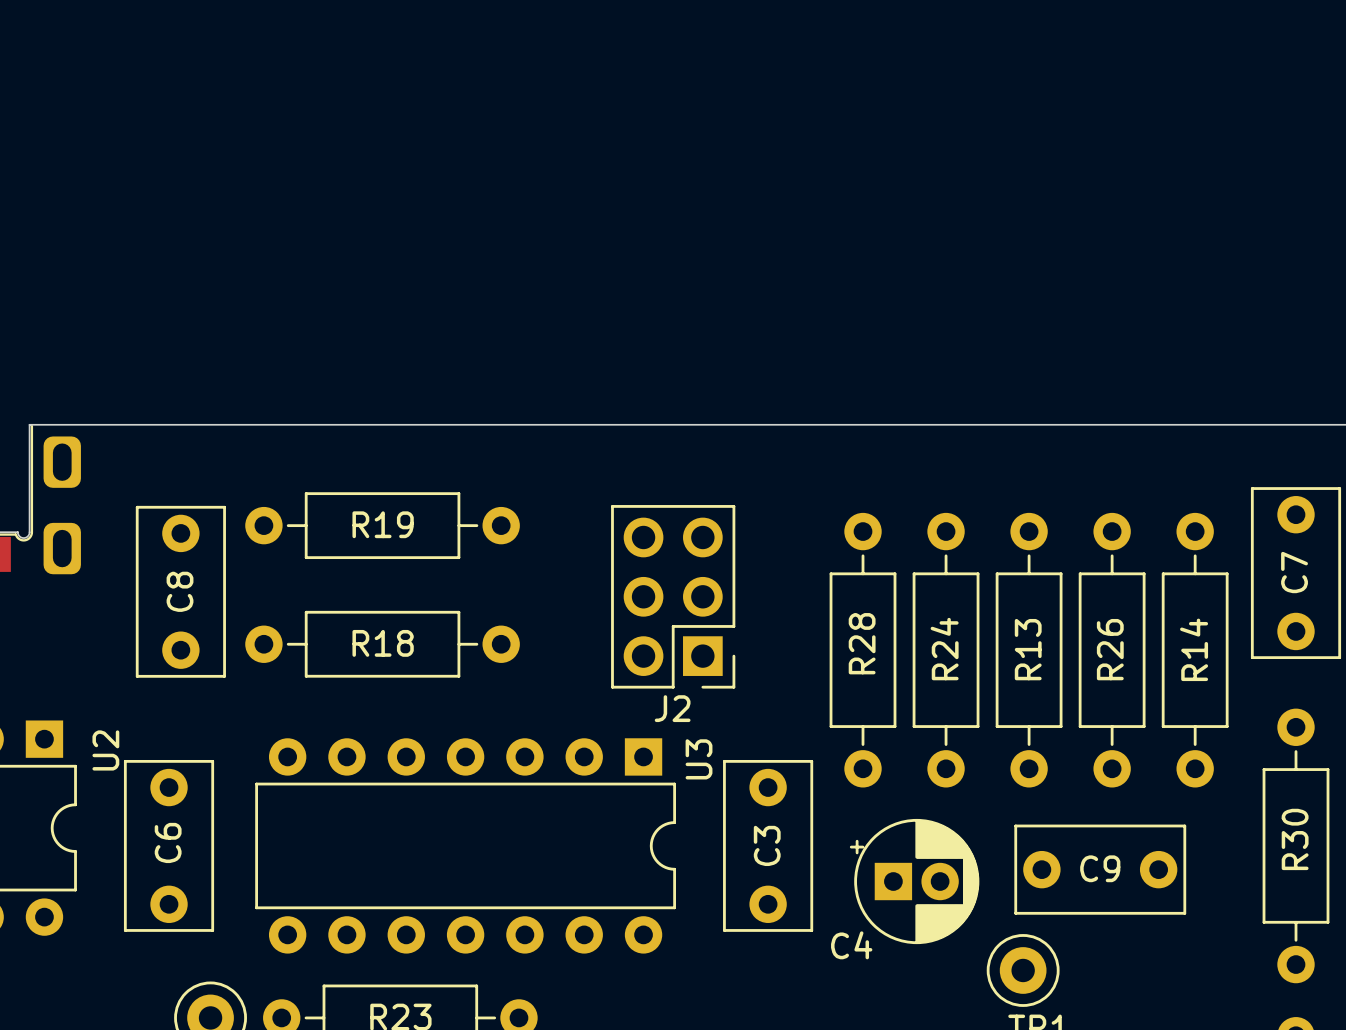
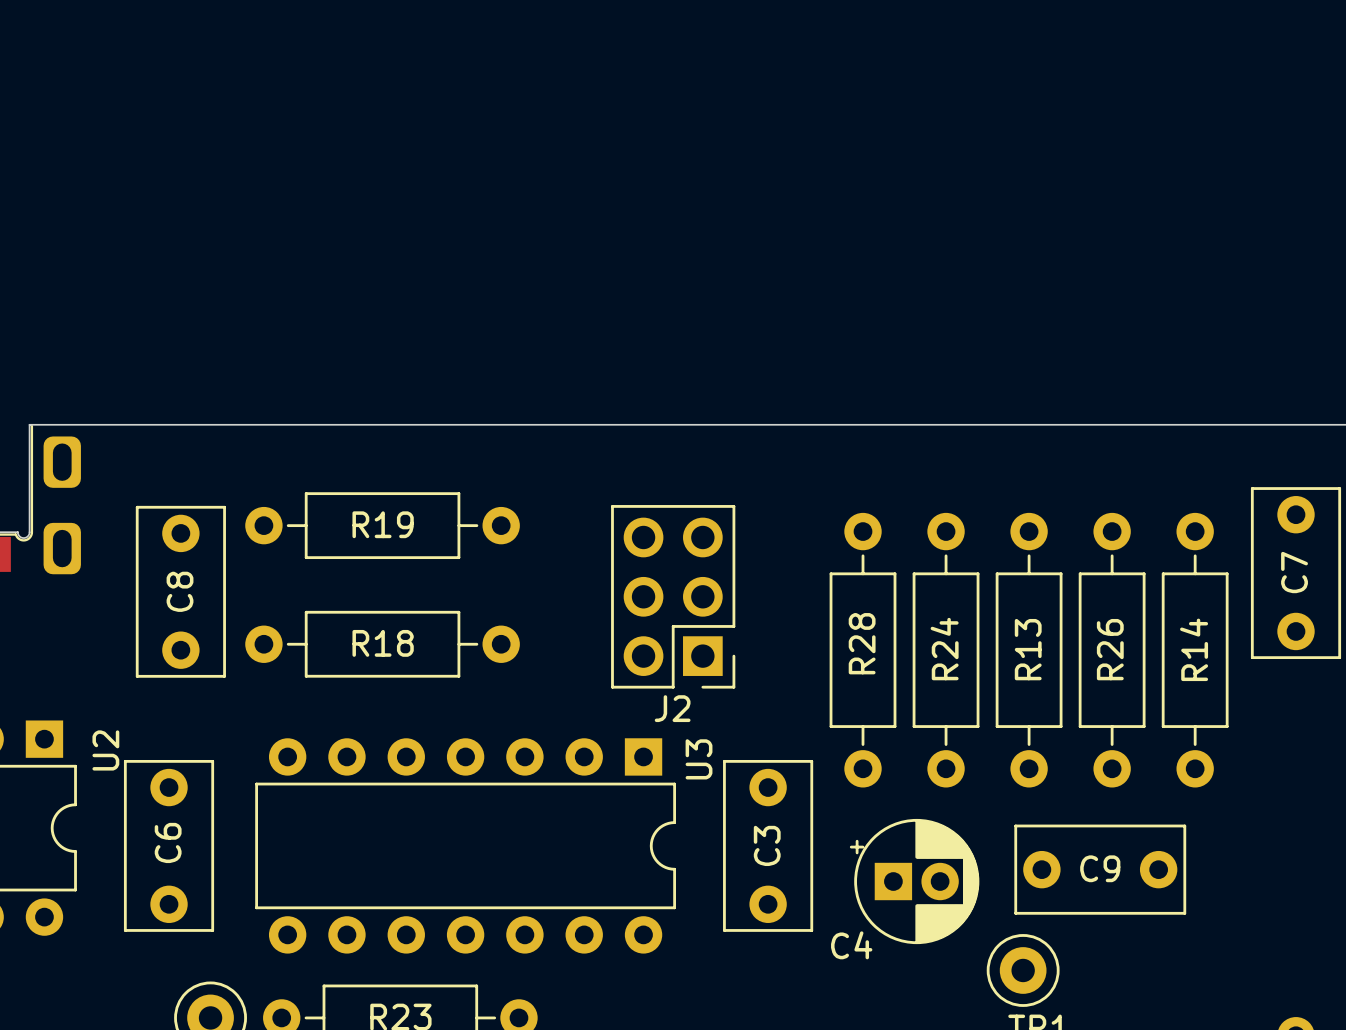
R30: (1296, 845) -> none

